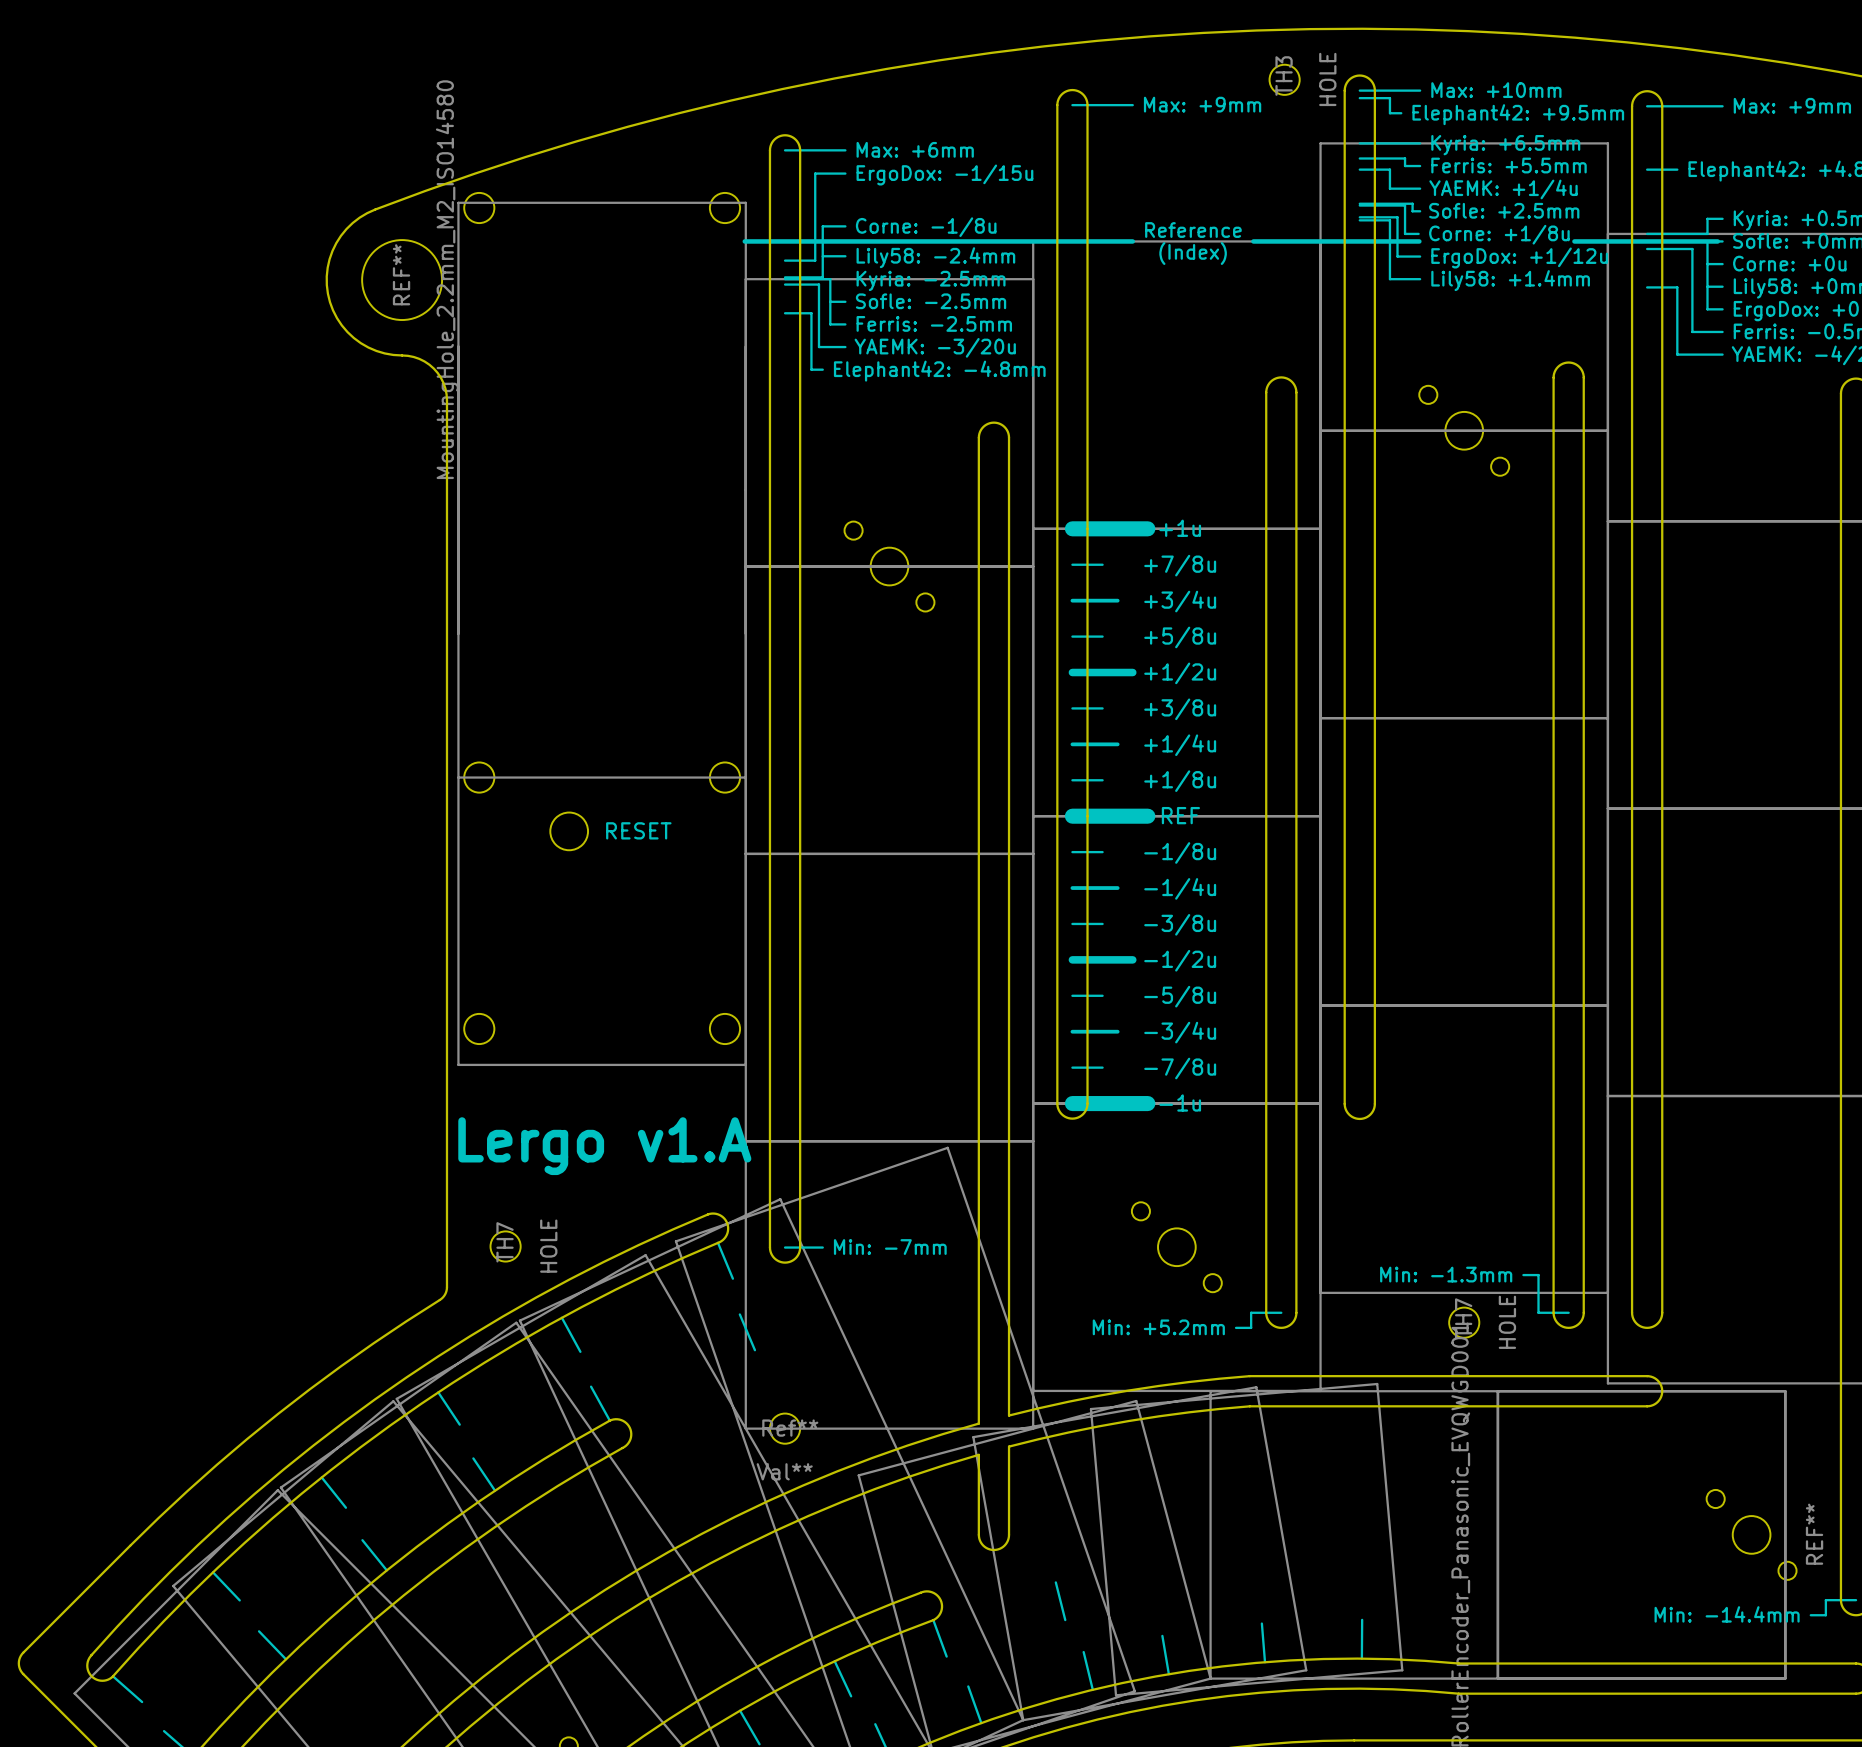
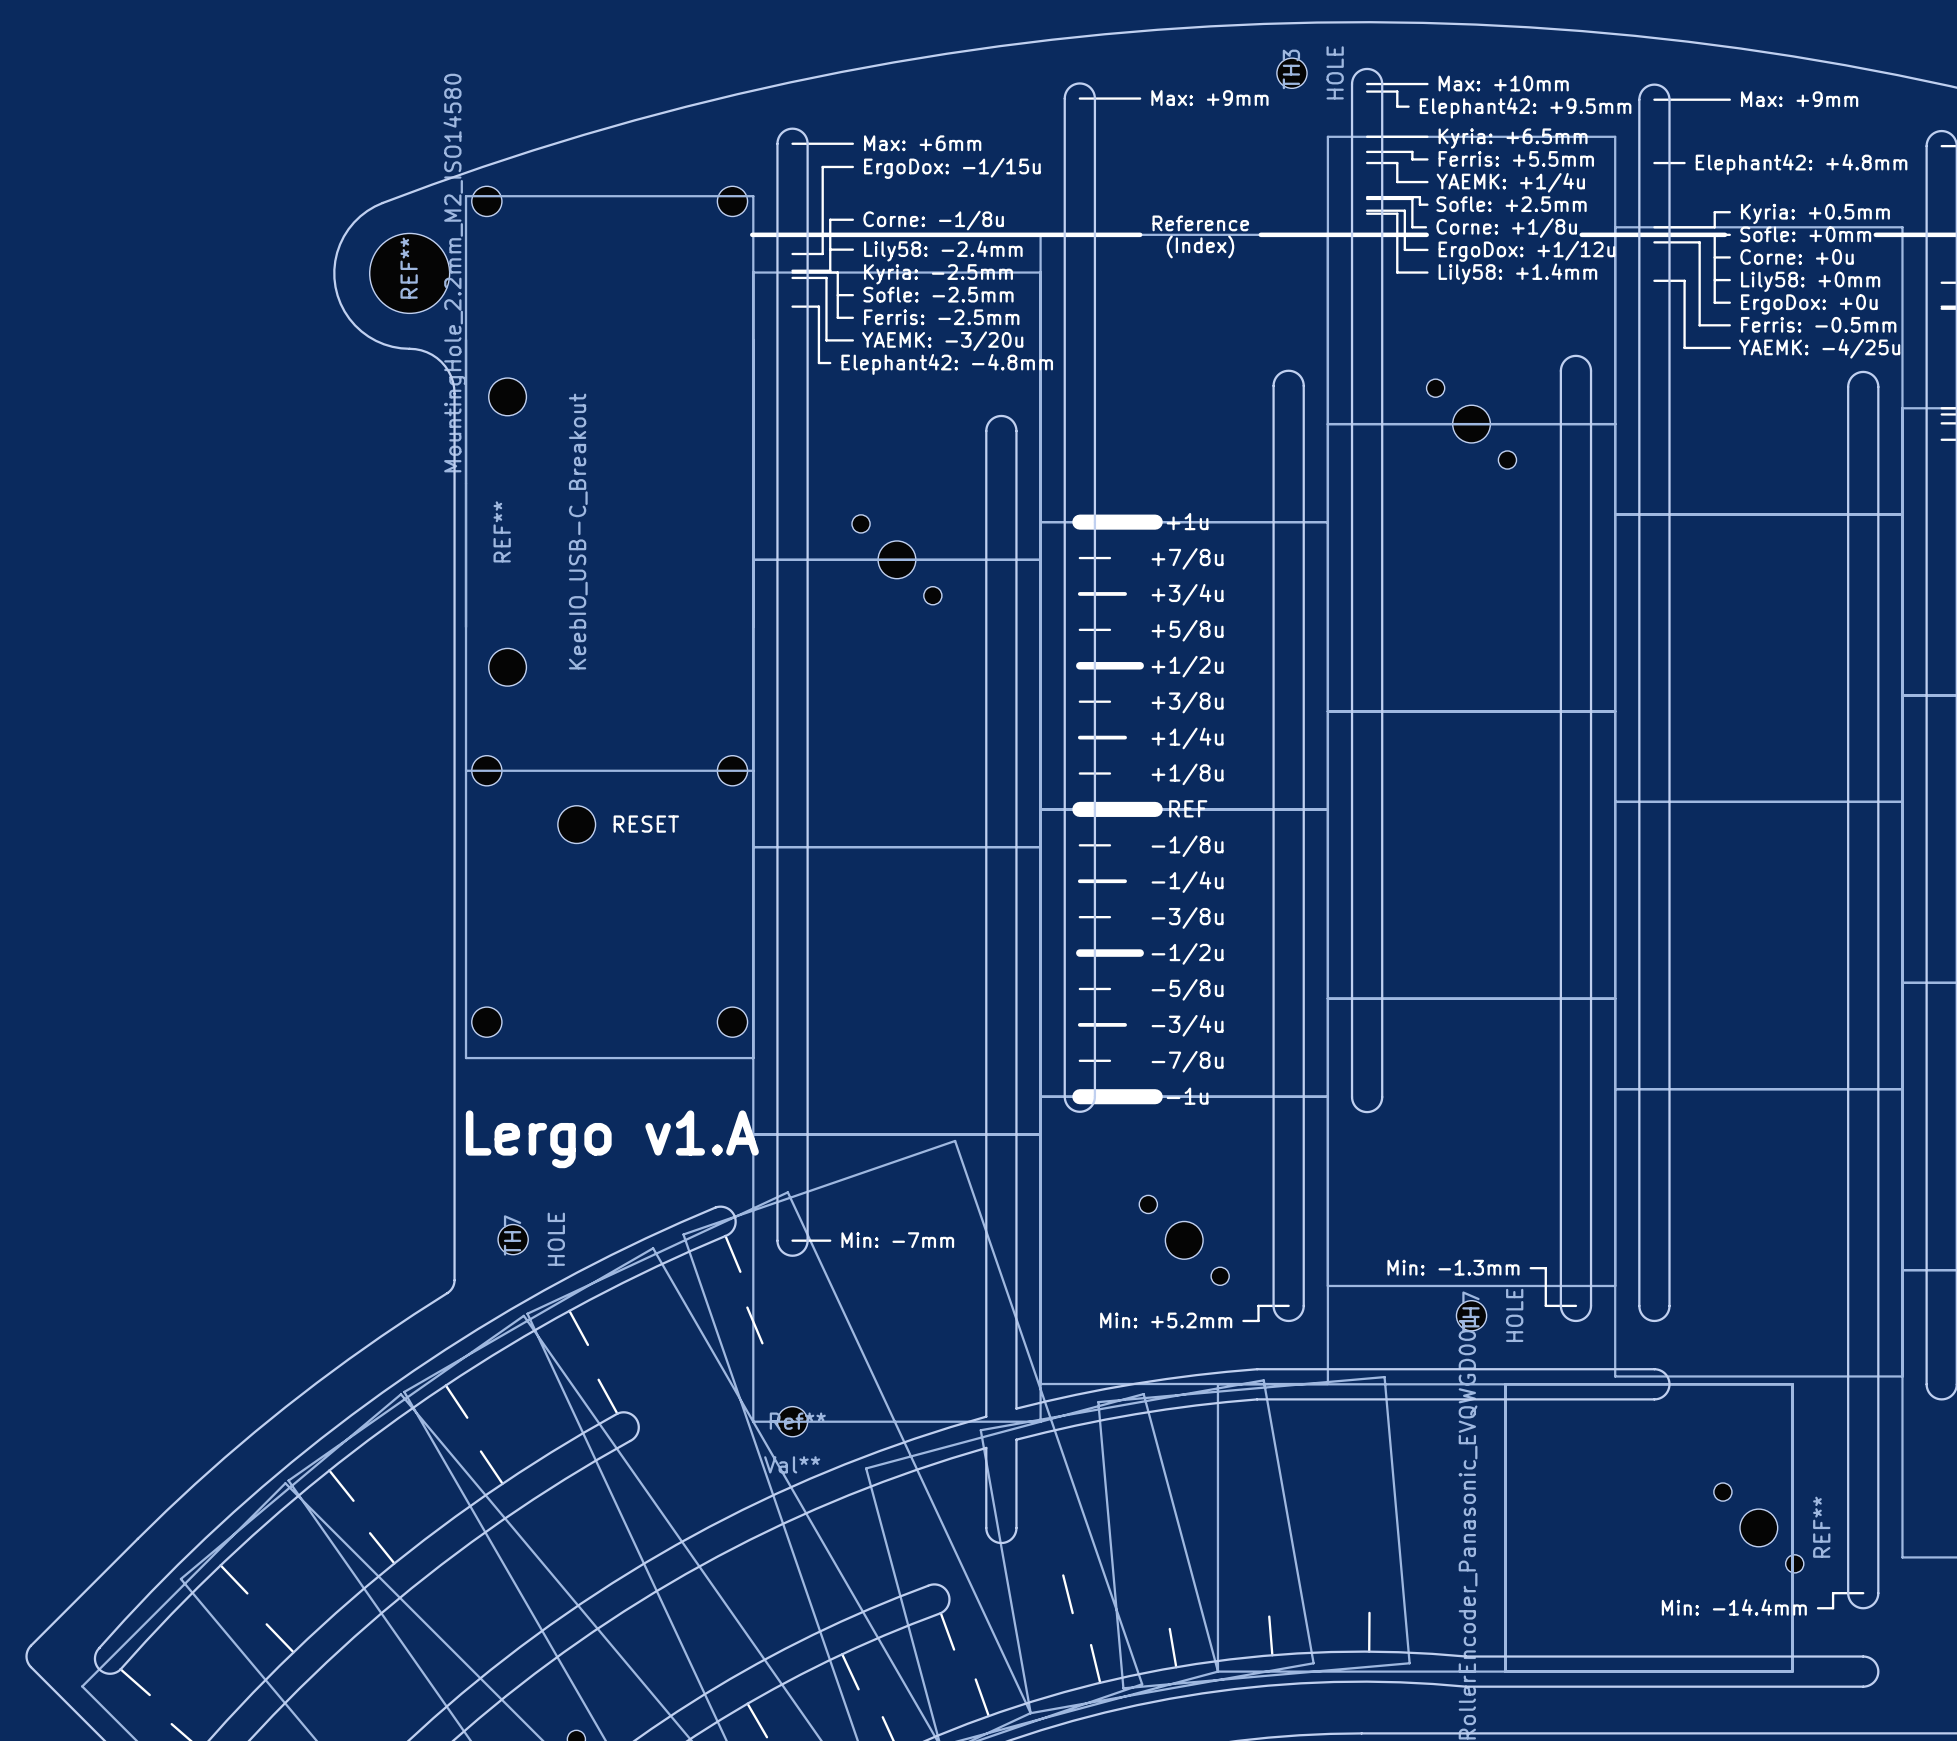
REF**: none -> KeebIO_USB-C_Breakout (507, 532)

